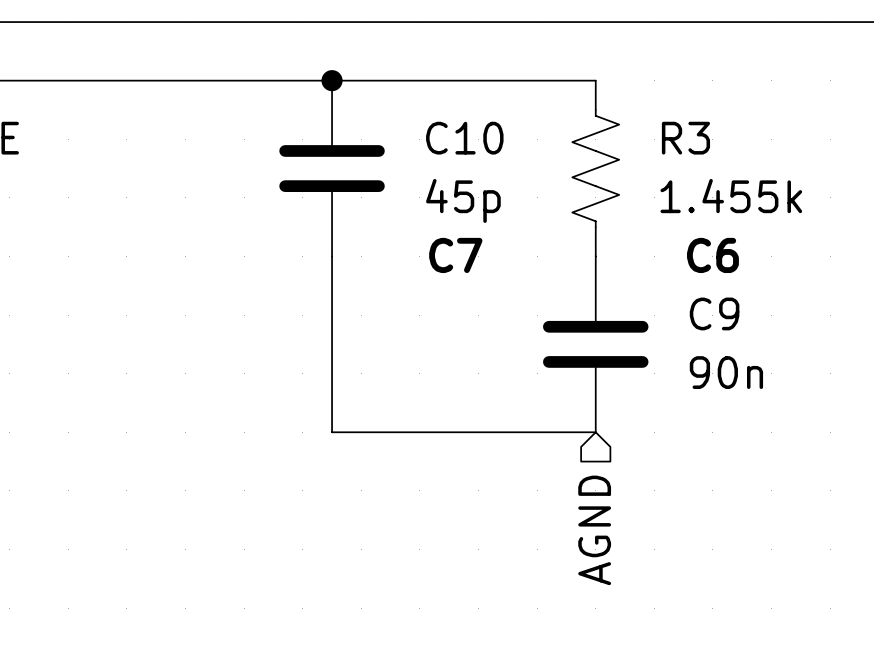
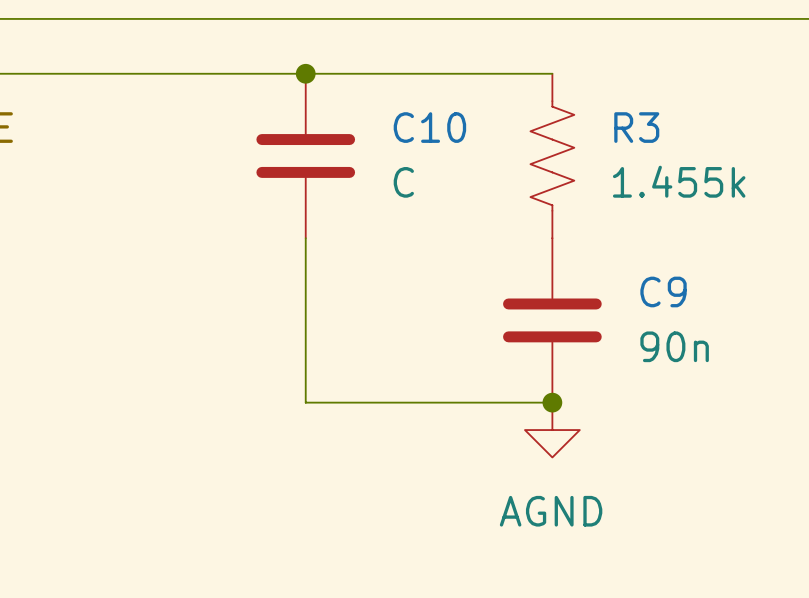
C10 value: 45p (463, 200) -> C (403, 182)
text: C7 (455, 255) -> none
text: C6 (712, 255) -> none
junction: none -> (552, 402)
power symbol: none -> AGND (552, 430)
hierarchical label: AGND (594, 530) -> none

